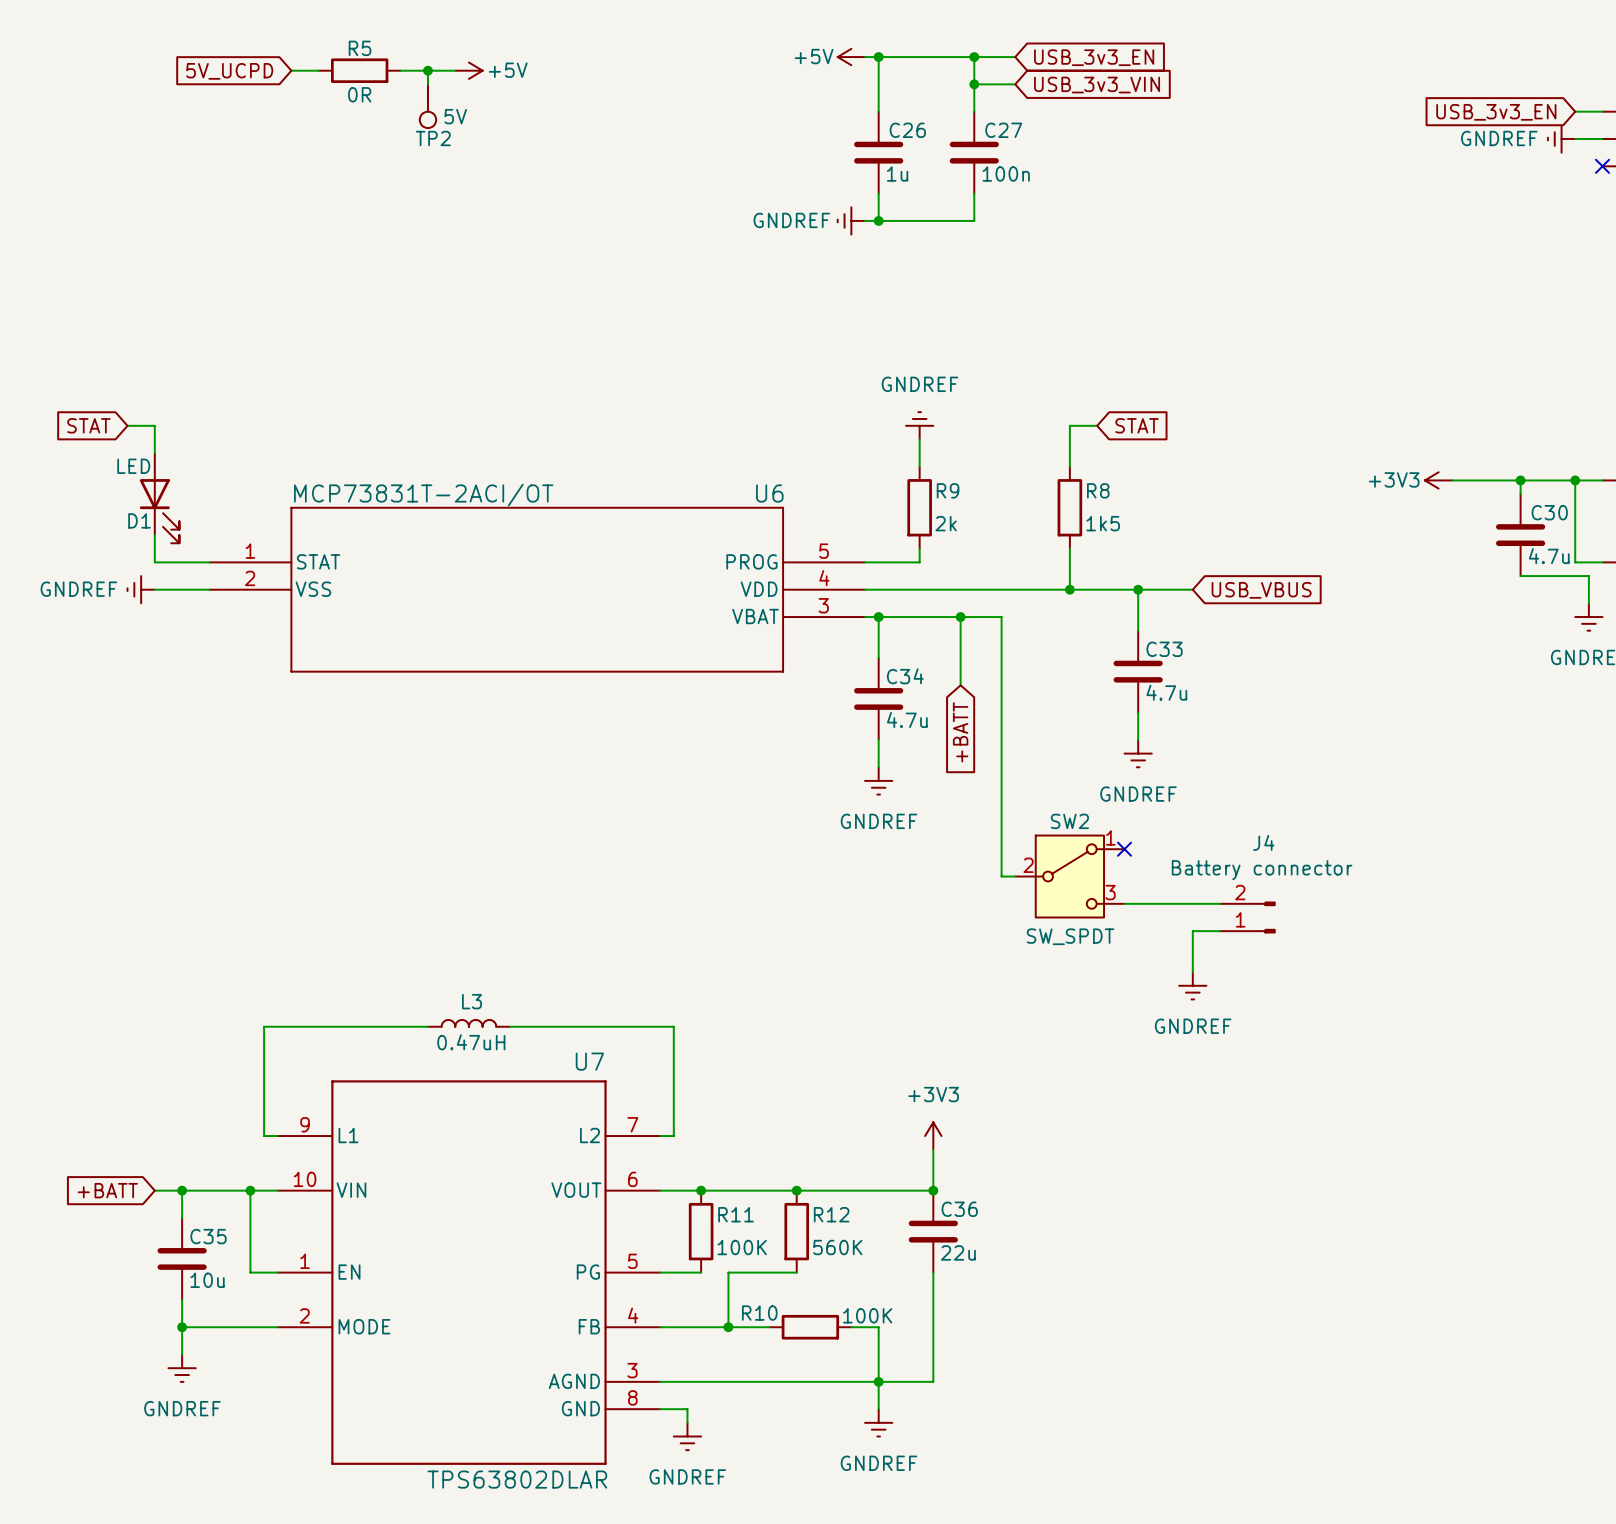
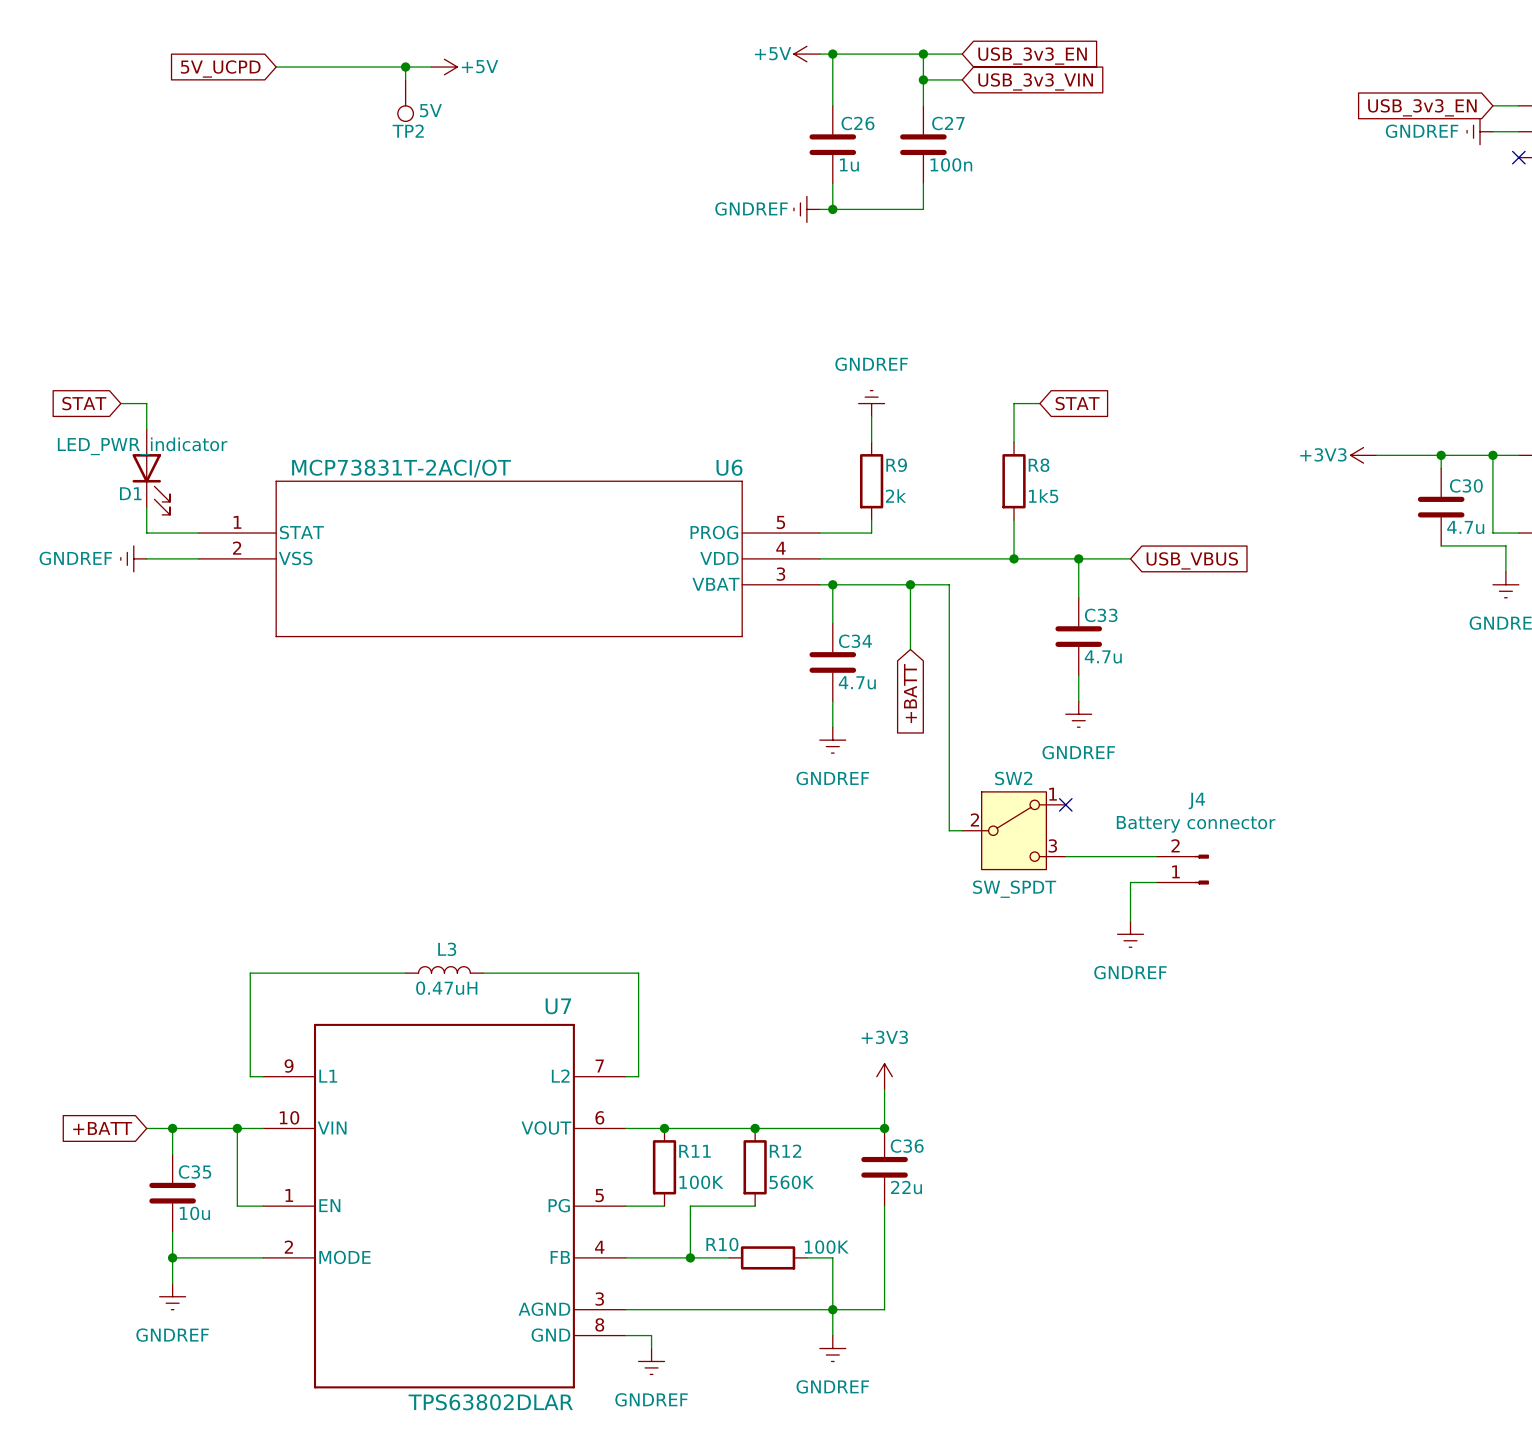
wire: none -> (302, 67) (379, 67)
R5: 0R (359, 70) -> none
D1 value: LED (133, 466) -> LED_PWR_indicator (142, 446)

